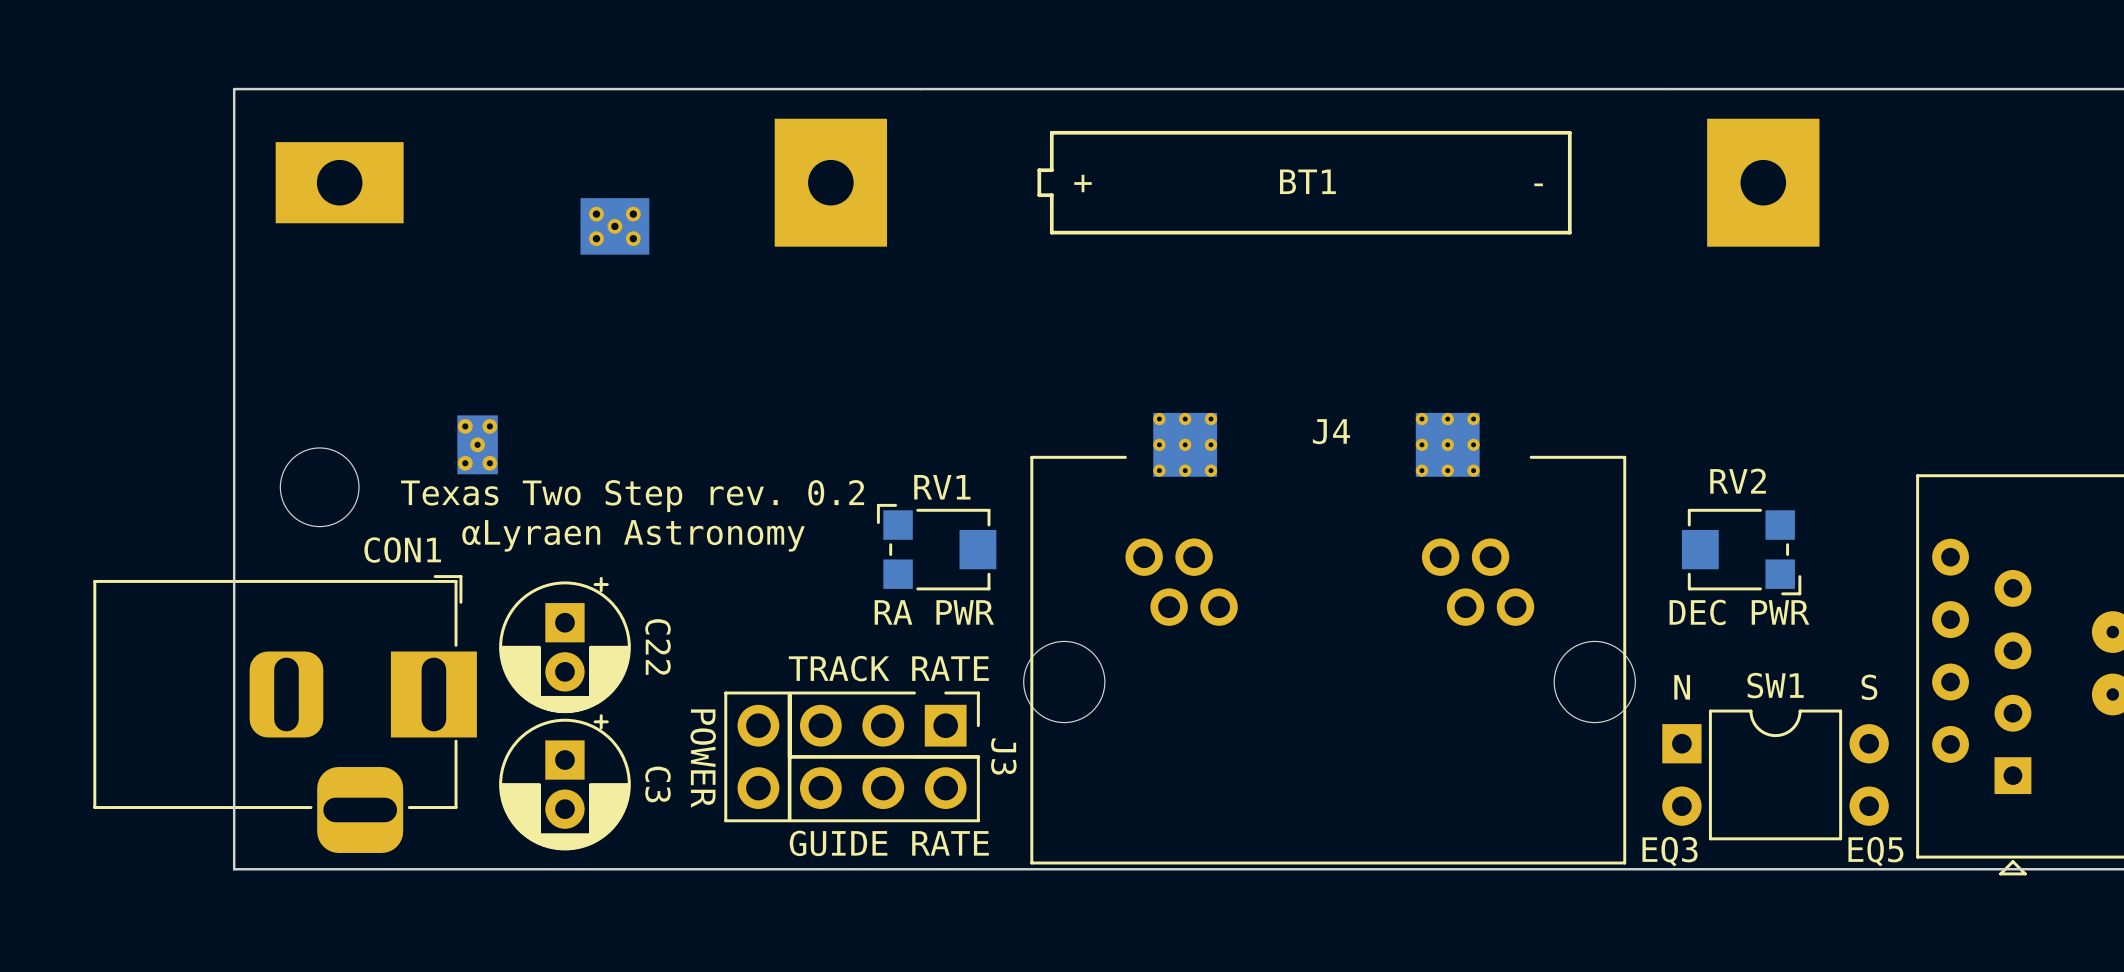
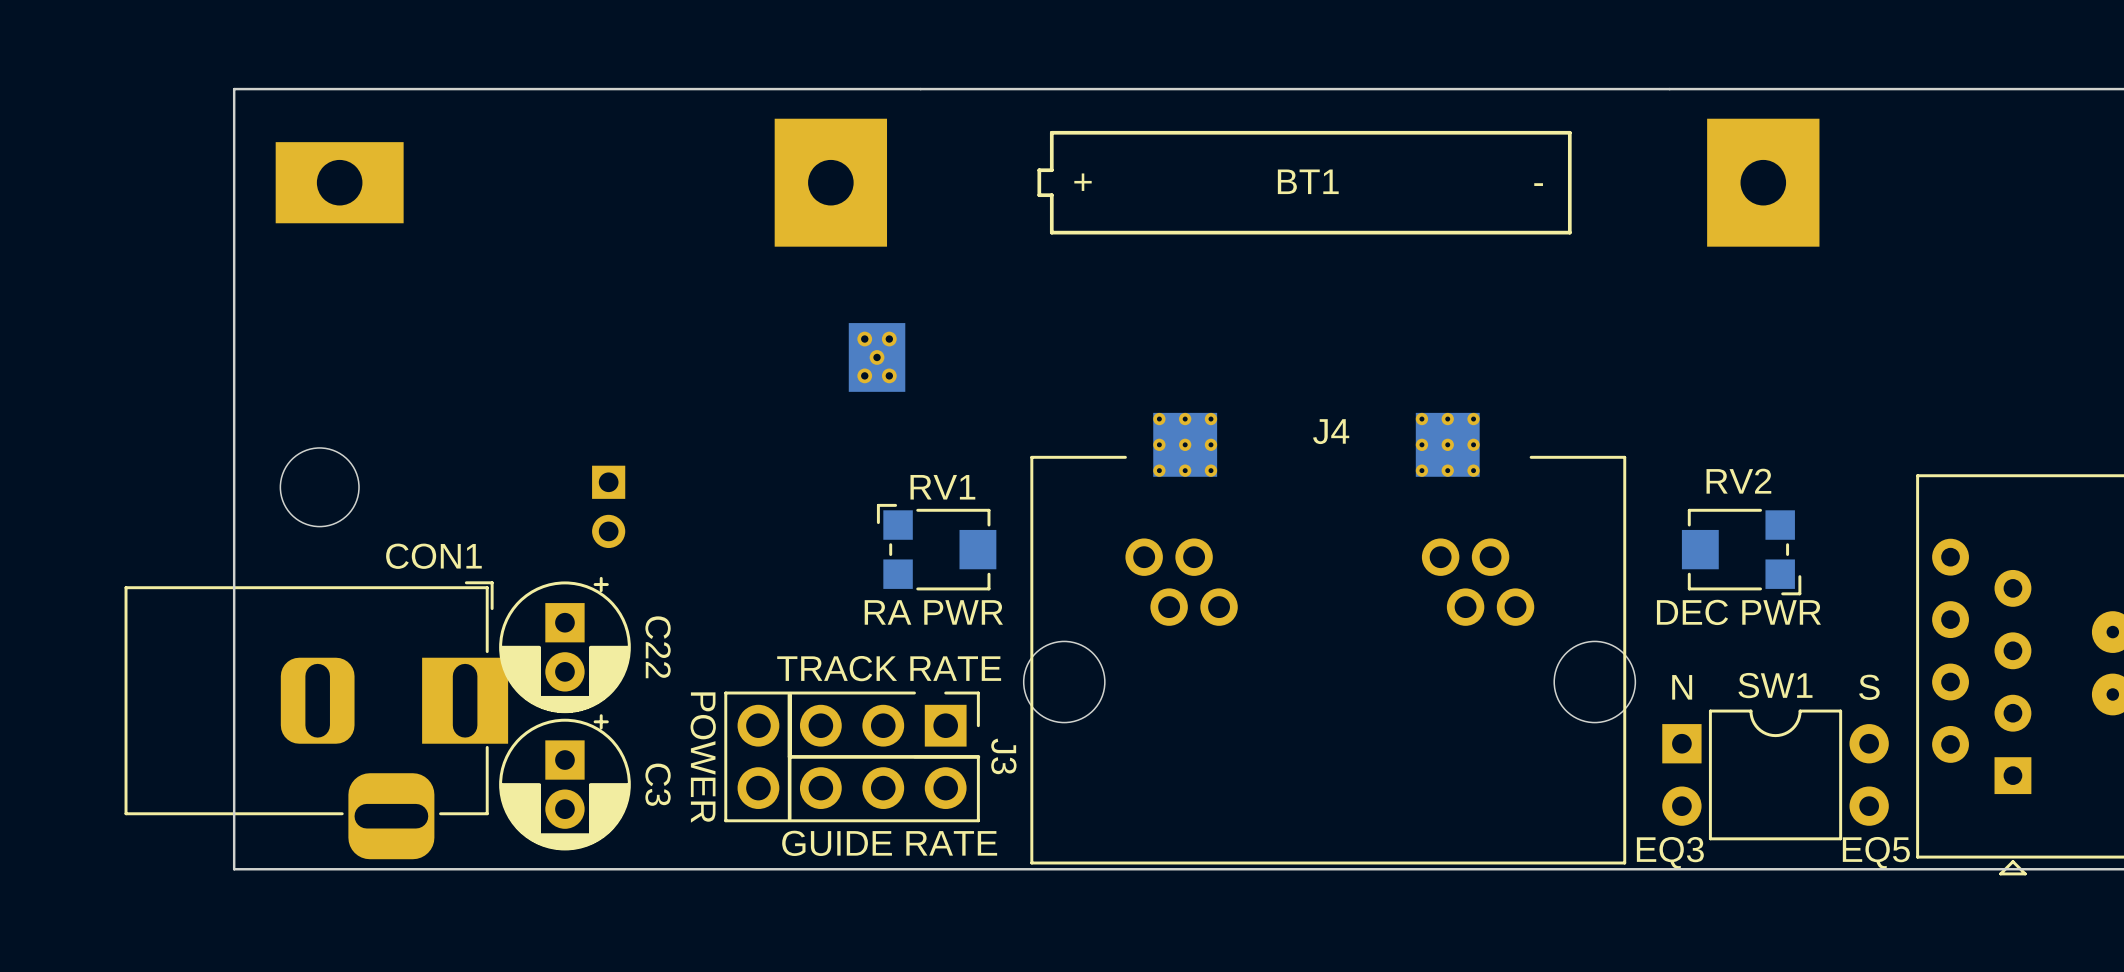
part rotation: 0° (614, 226) -> 90° clockwise (877, 357)
part position: (614, 226) -> (877, 357)
part: (477, 444) -> none
text: Texas Two Step rev. 0.2 (632, 496) -> none
part: none -> (608, 506)
text: αLyraen Astronomy (633, 535) -> none
CON1 position: (285, 714) -> (316, 720)

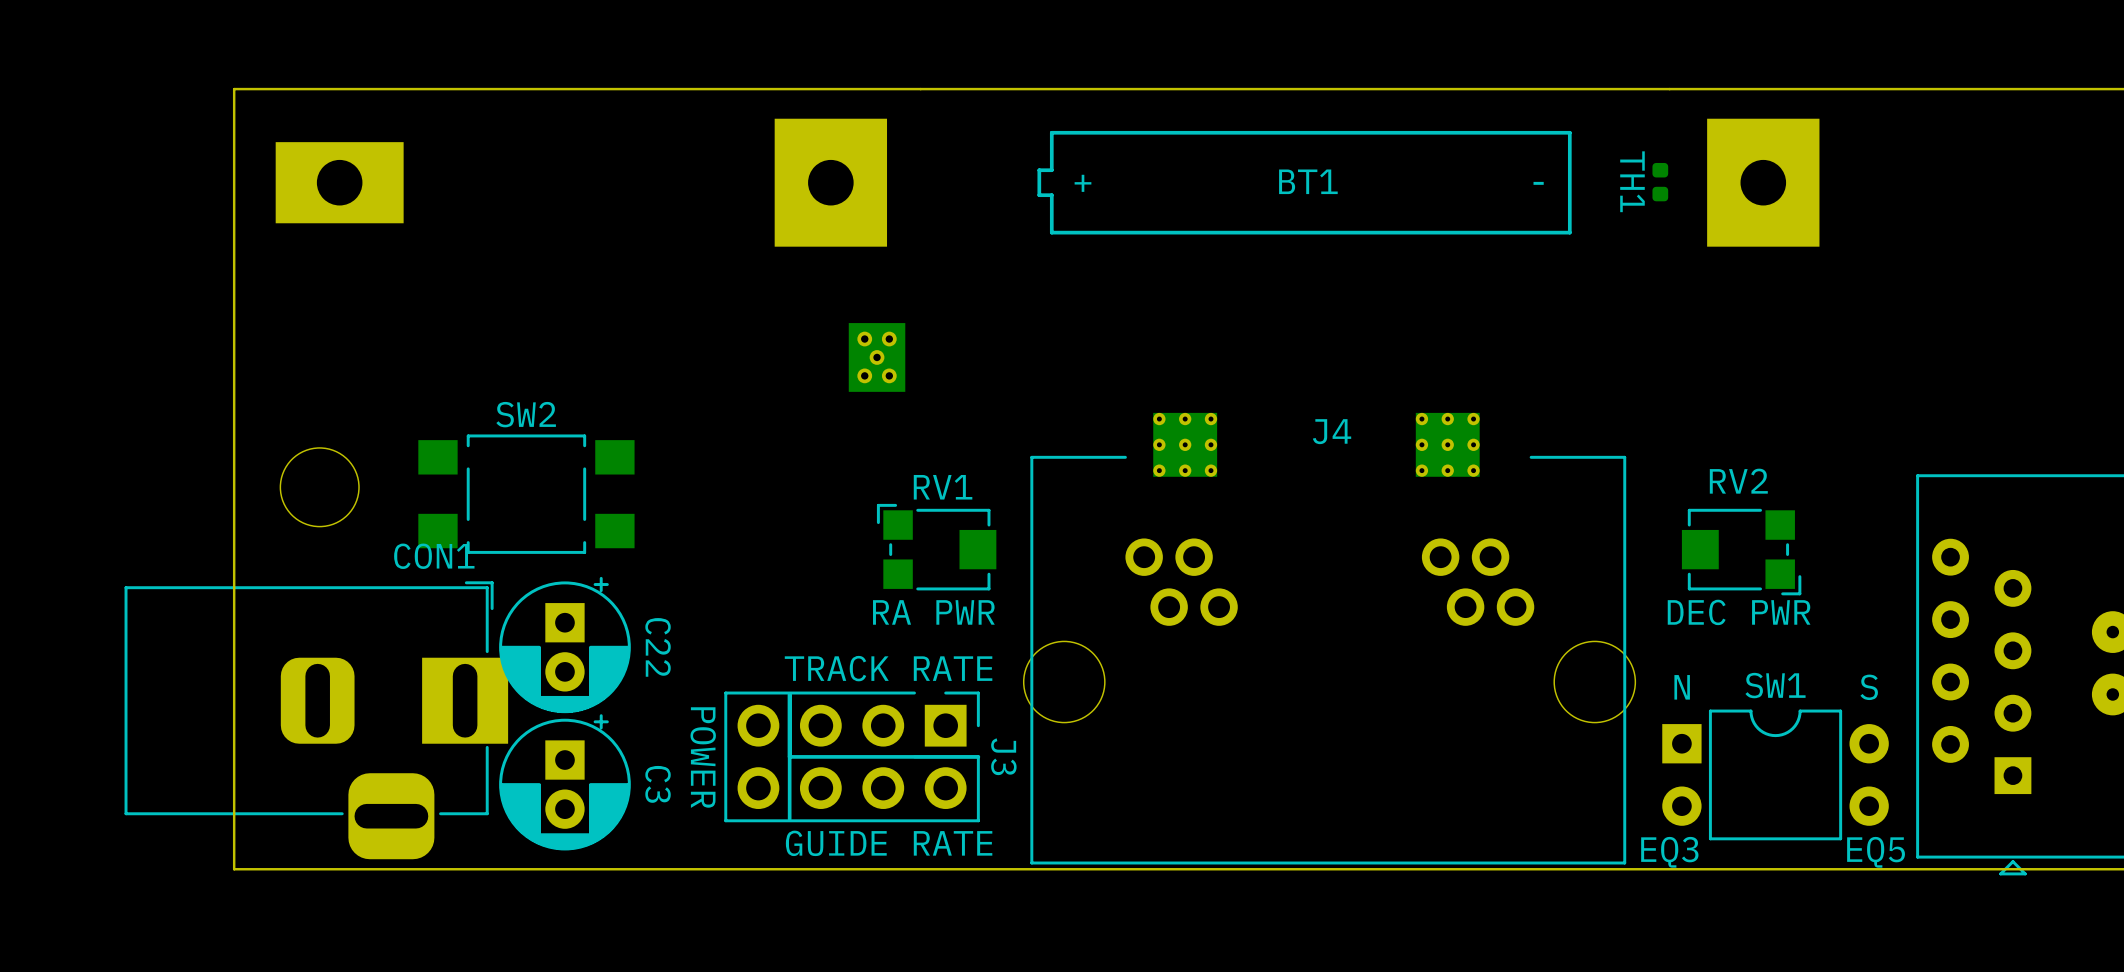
TH1: none -> (1660, 182)
SW2: none -> (526, 494)
part: (608, 506) -> none

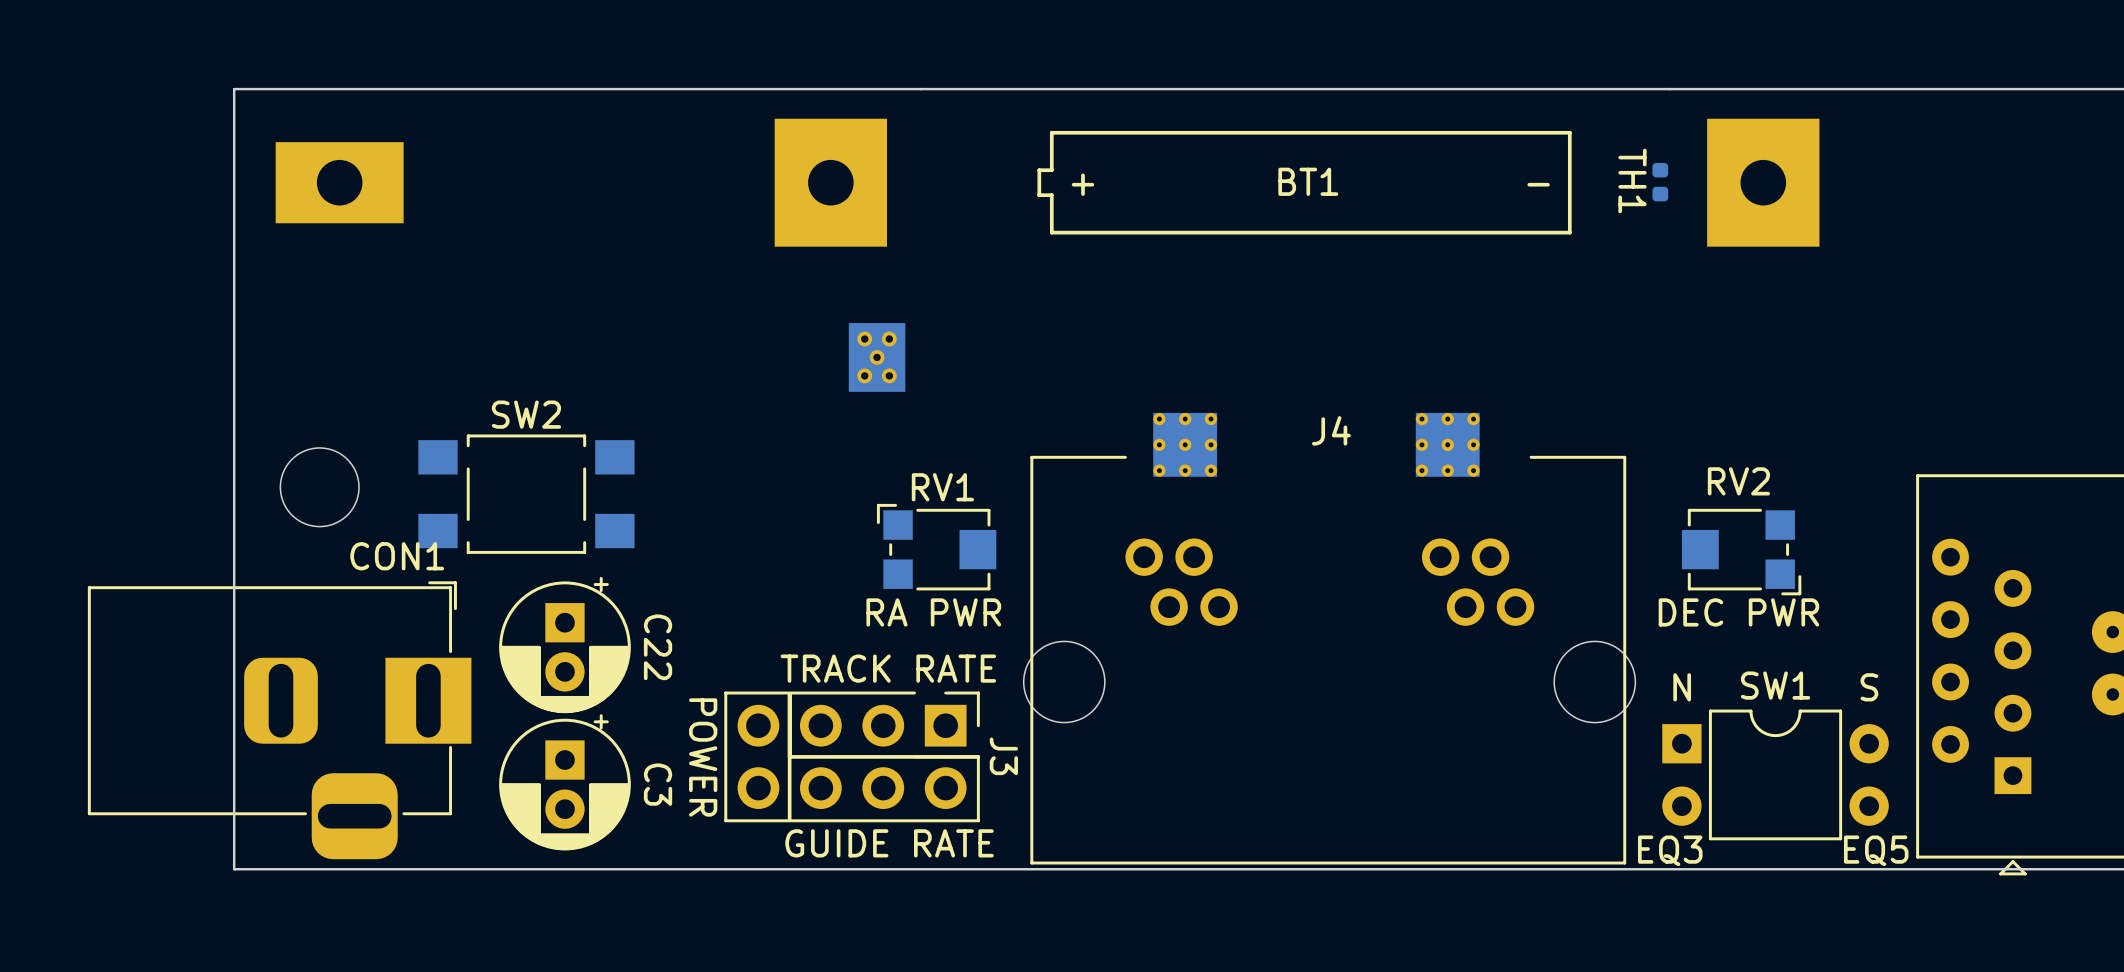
CON1 position: (316, 720) -> (279, 720)

